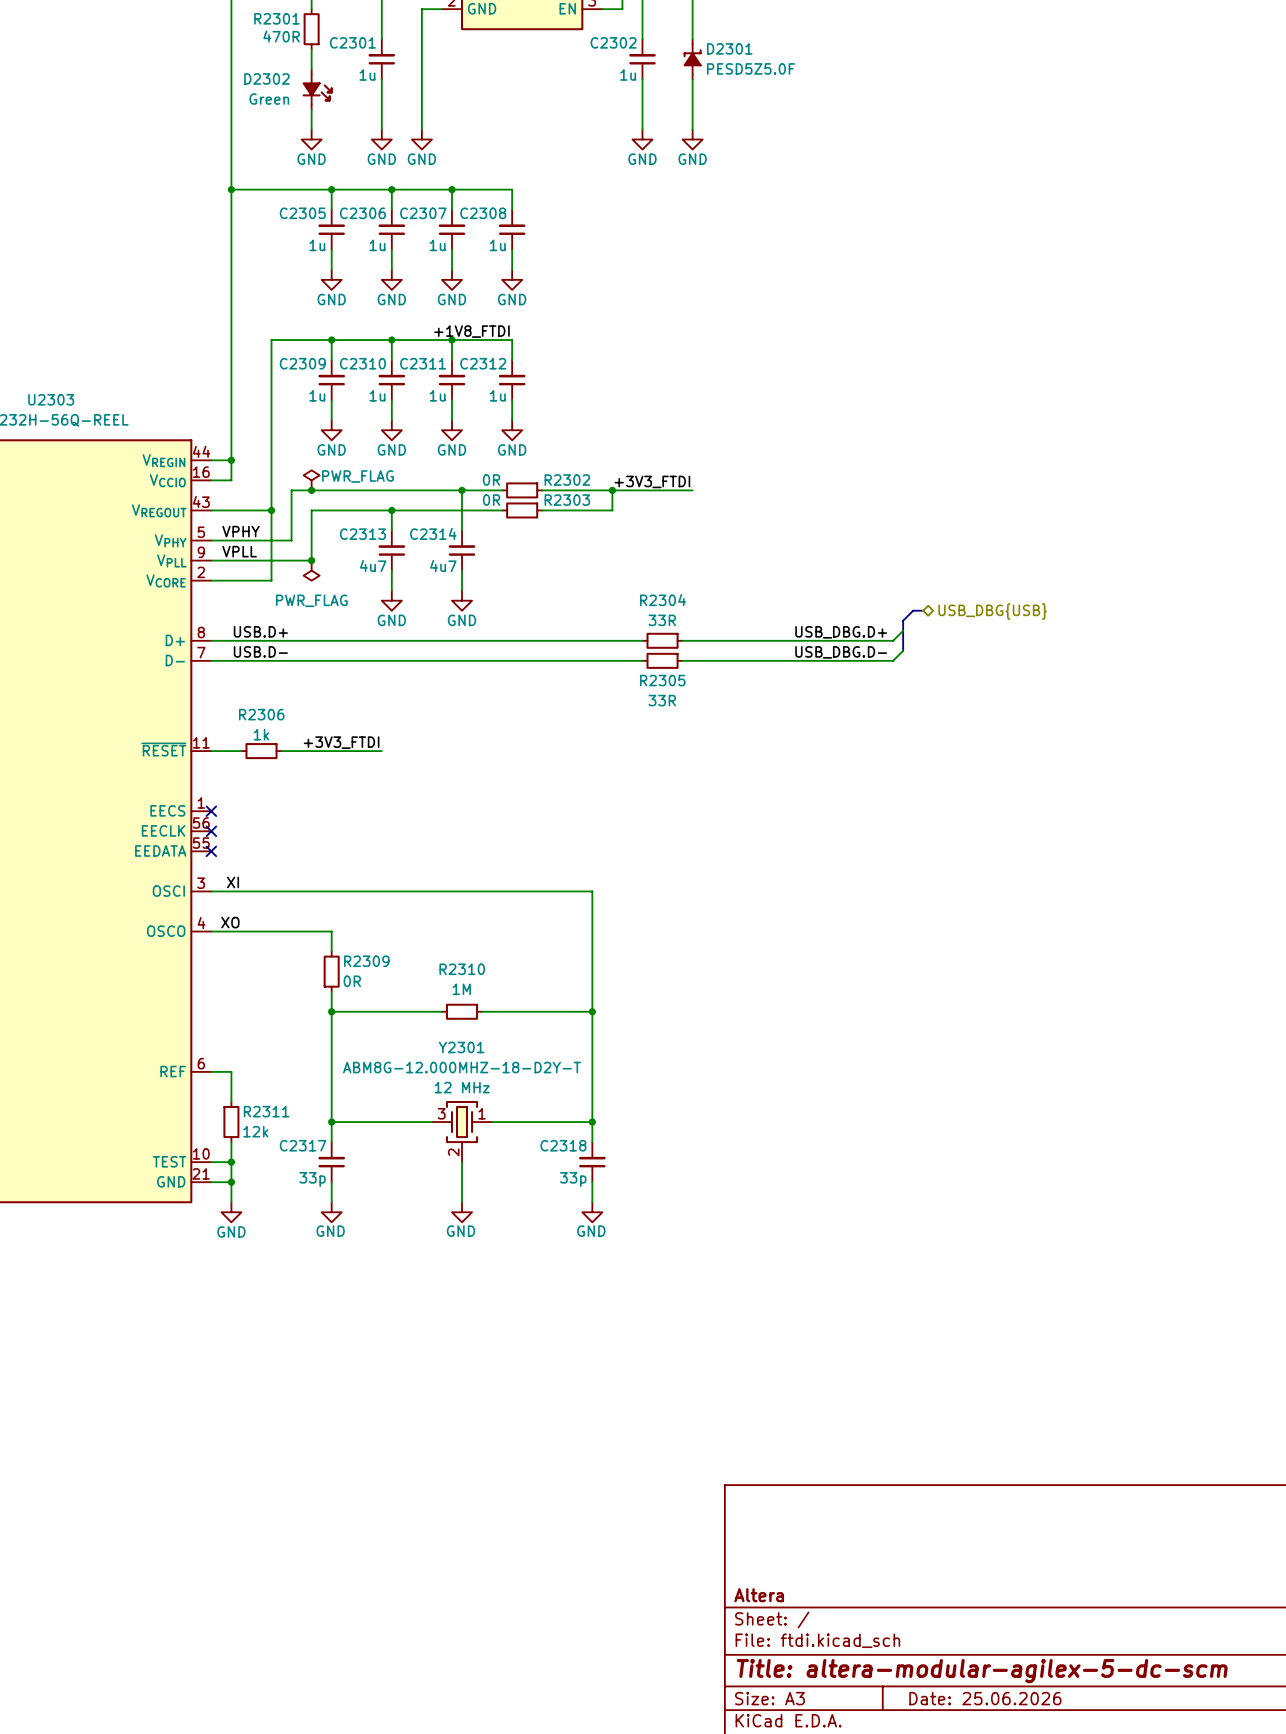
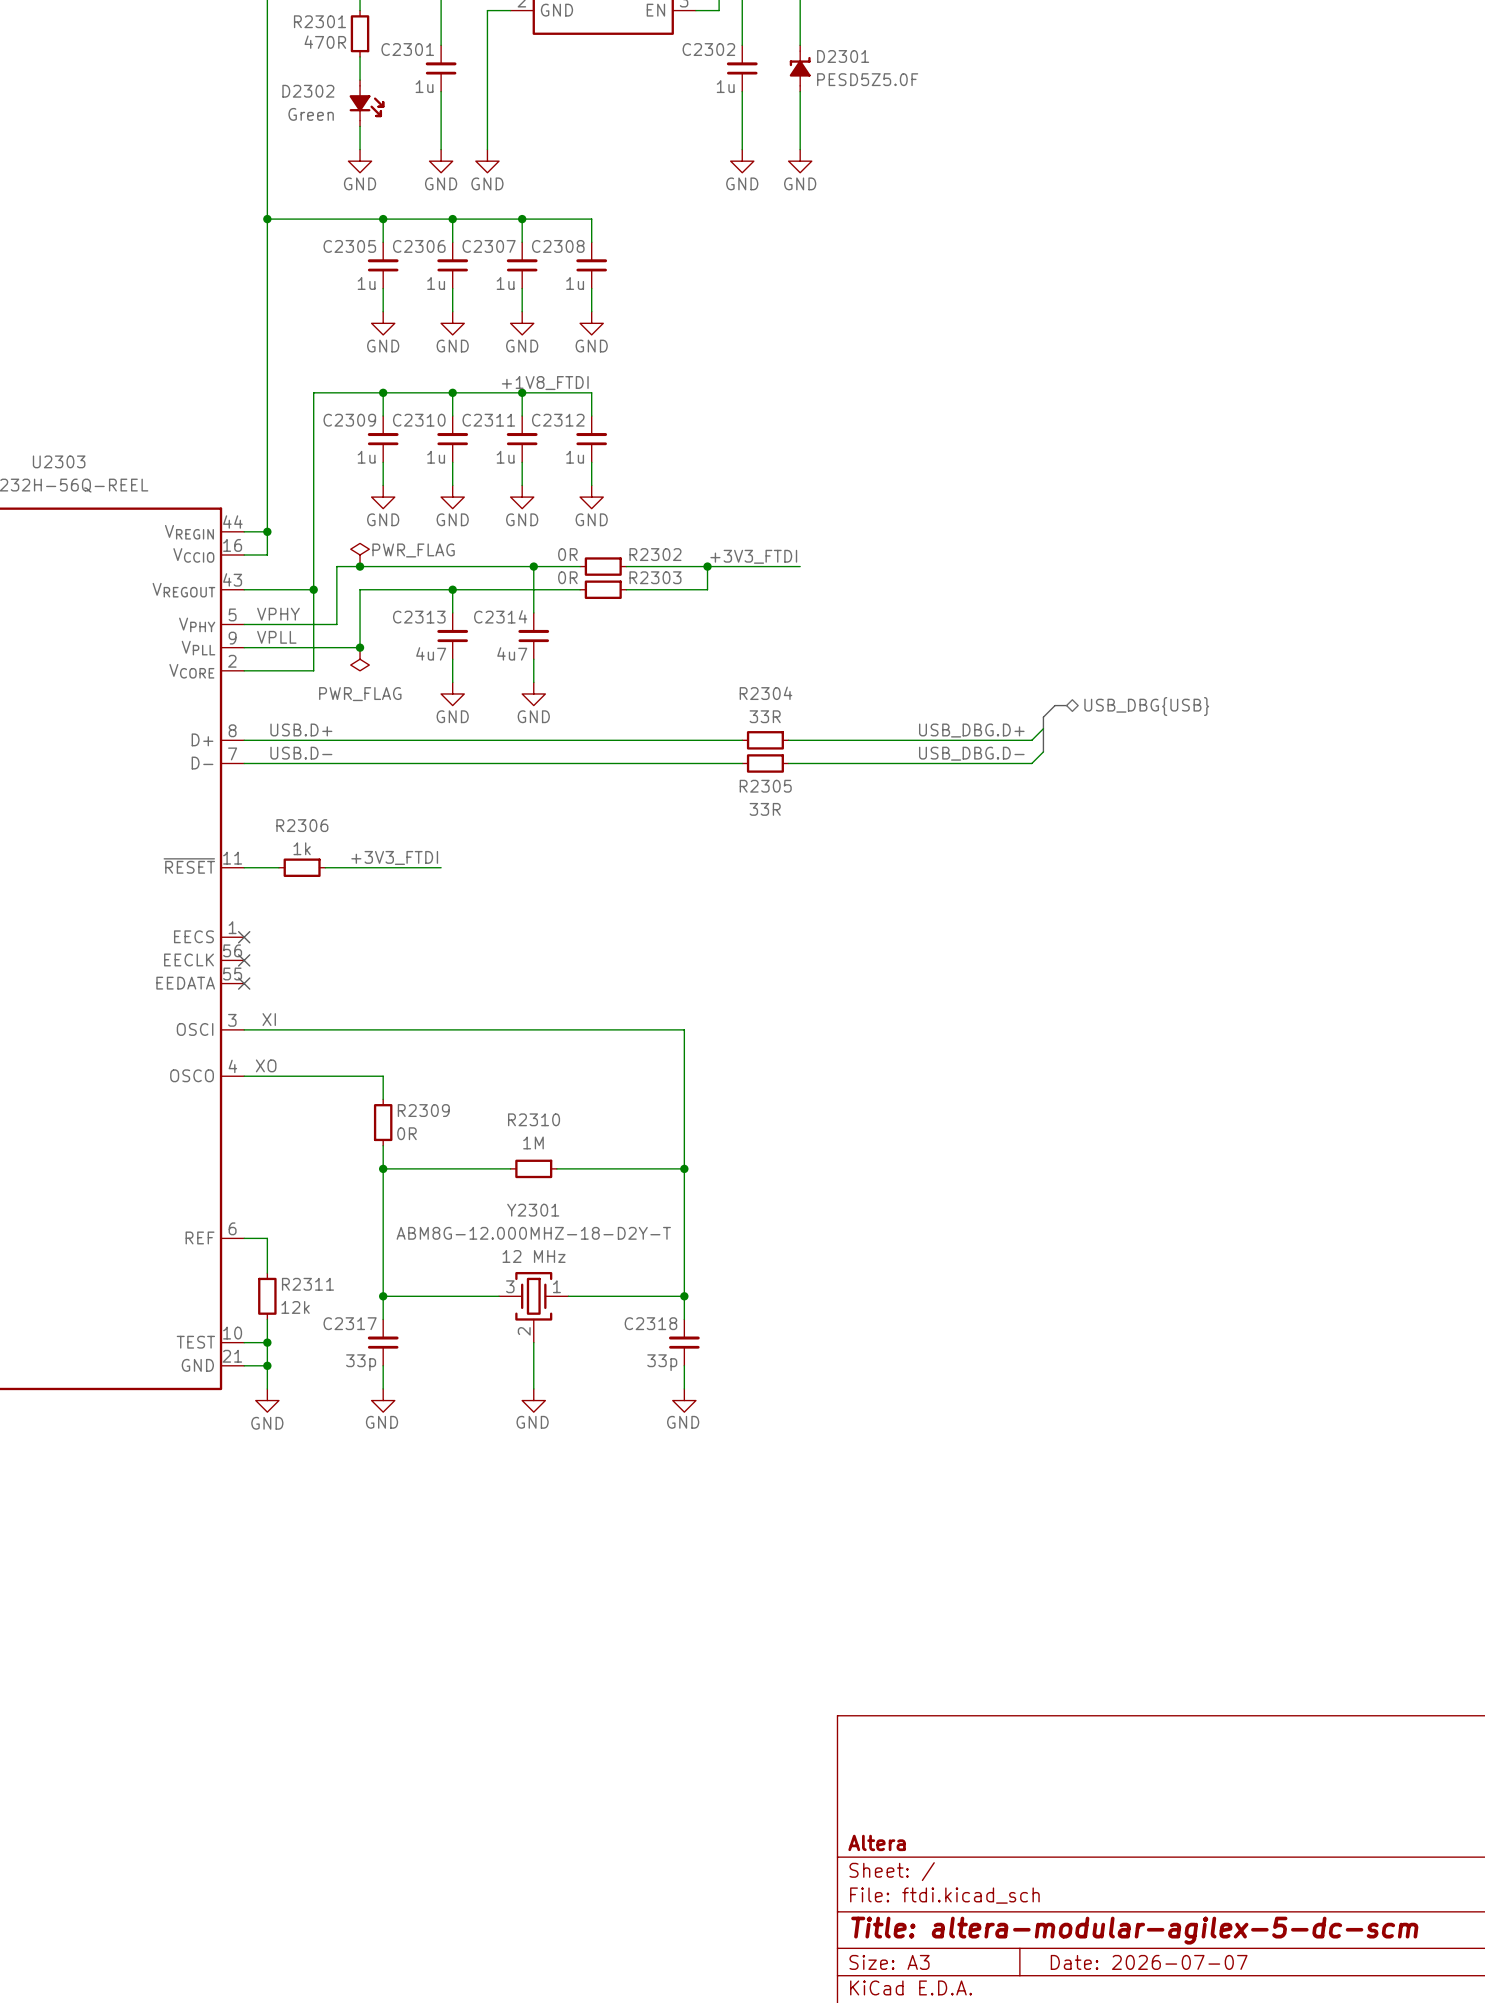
title block: Date: 25.06.2026 (985, 1698) -> Date: 2026-07-07 (1149, 1962)

